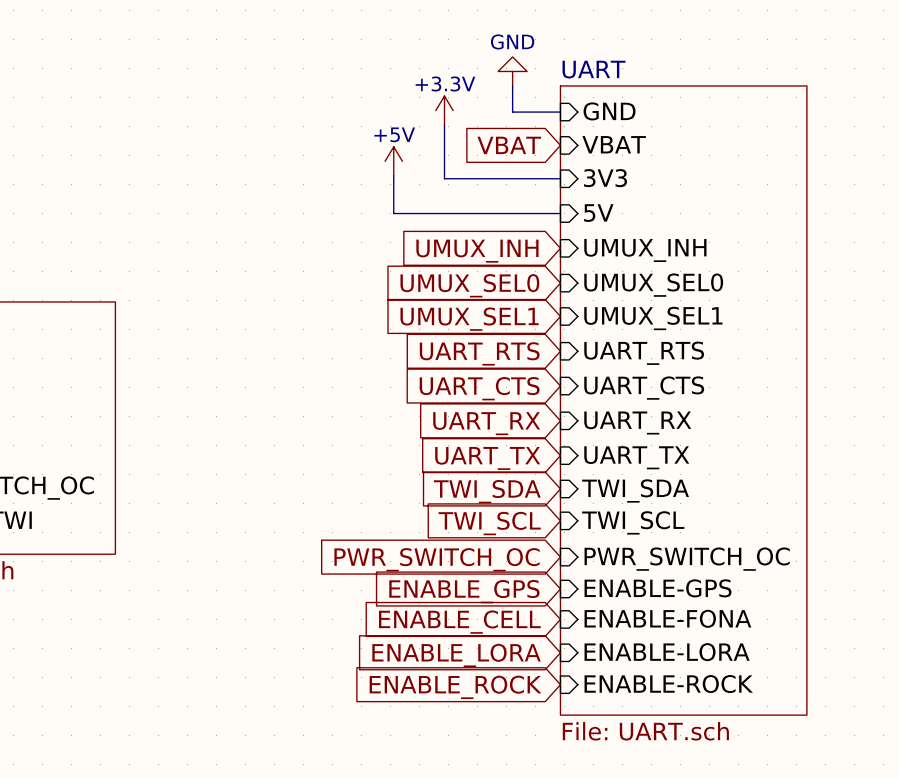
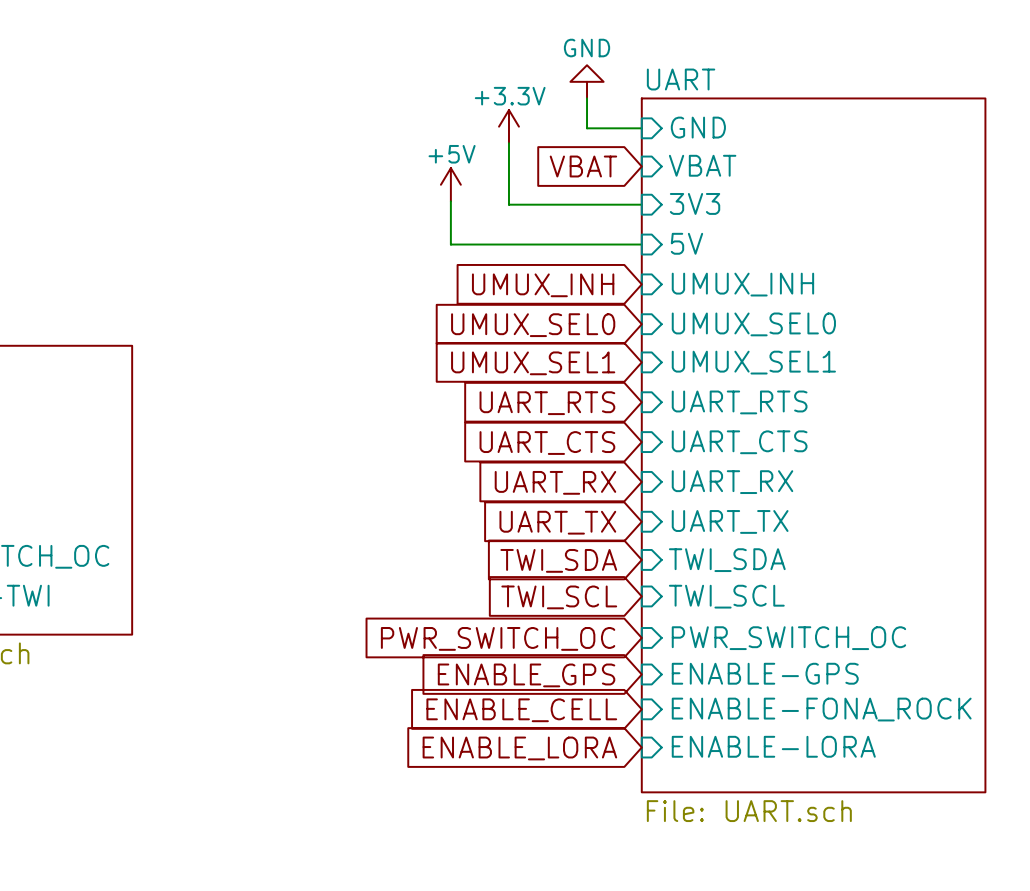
sheet UART: none -> File: UART.sch (813, 445)
sheet UART: File: UART.sch (683, 400) -> none
sheet pin: ENABLE-FONA (667, 618) -> ENABLE-FONA_ROCK (821, 709)
sheet pin: ENABLE-ROCK (668, 684) -> none
global label: ENABLE_ROCK (455, 687) -> none

